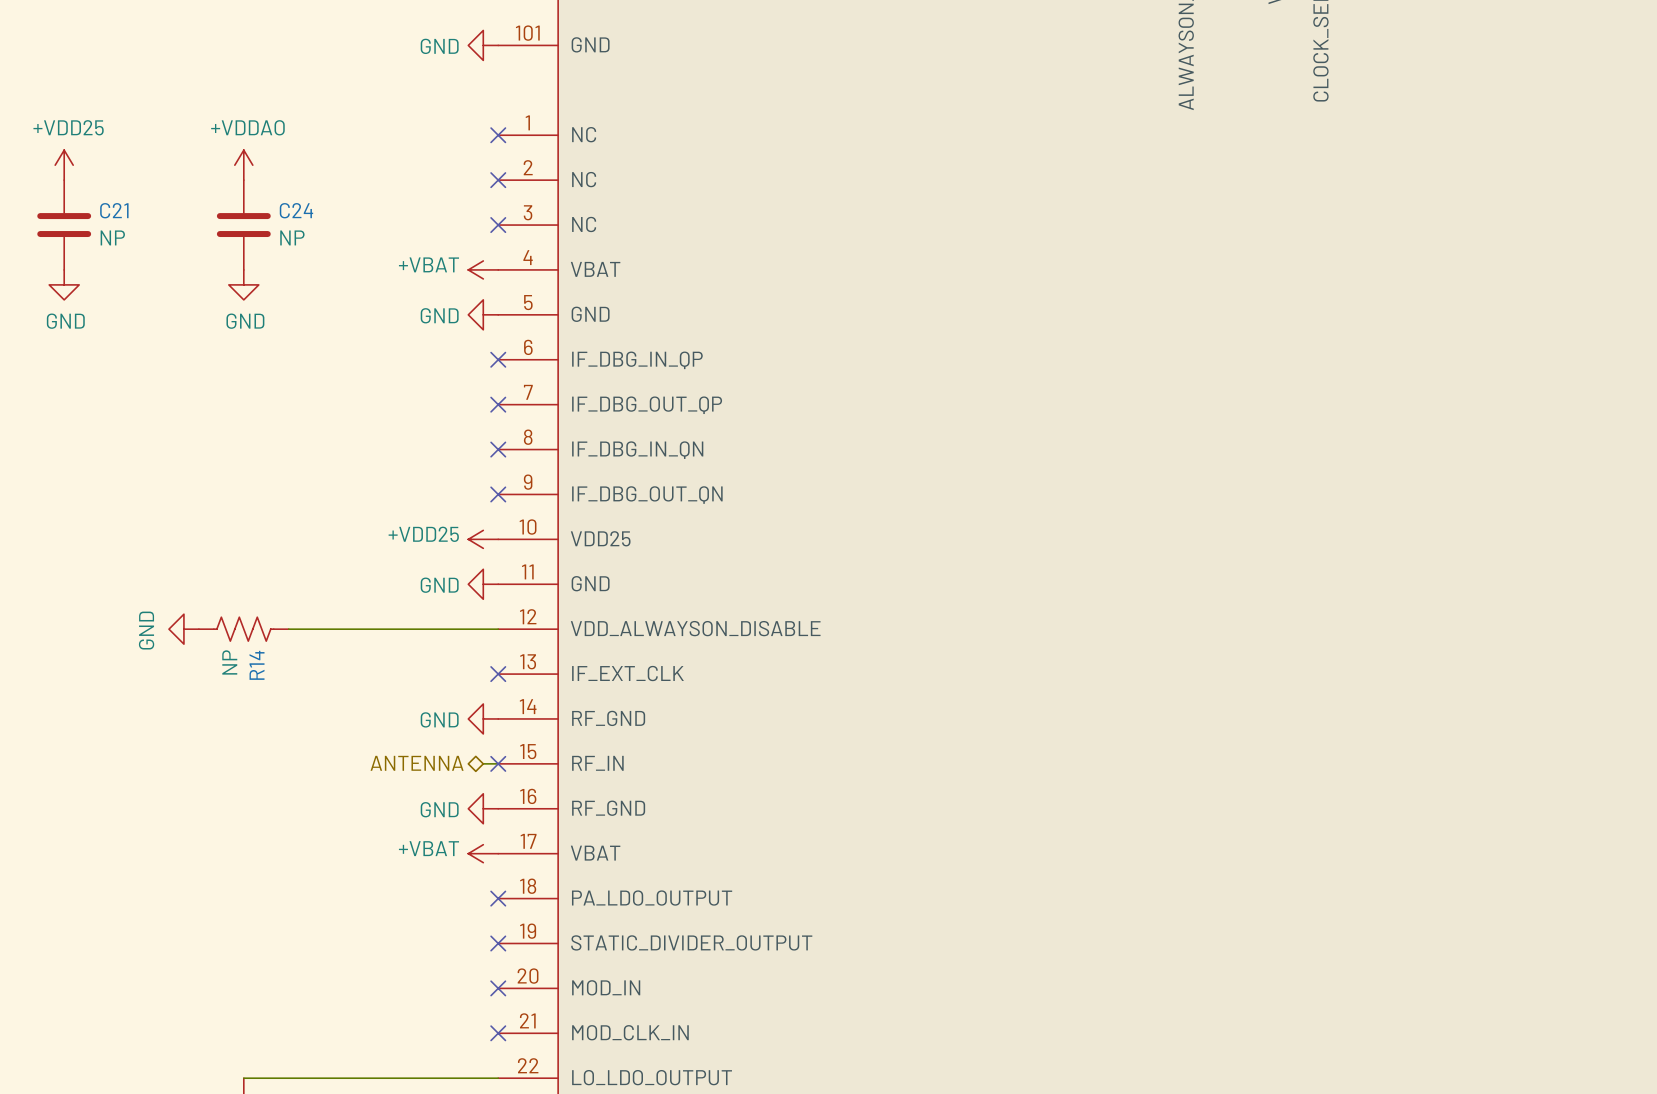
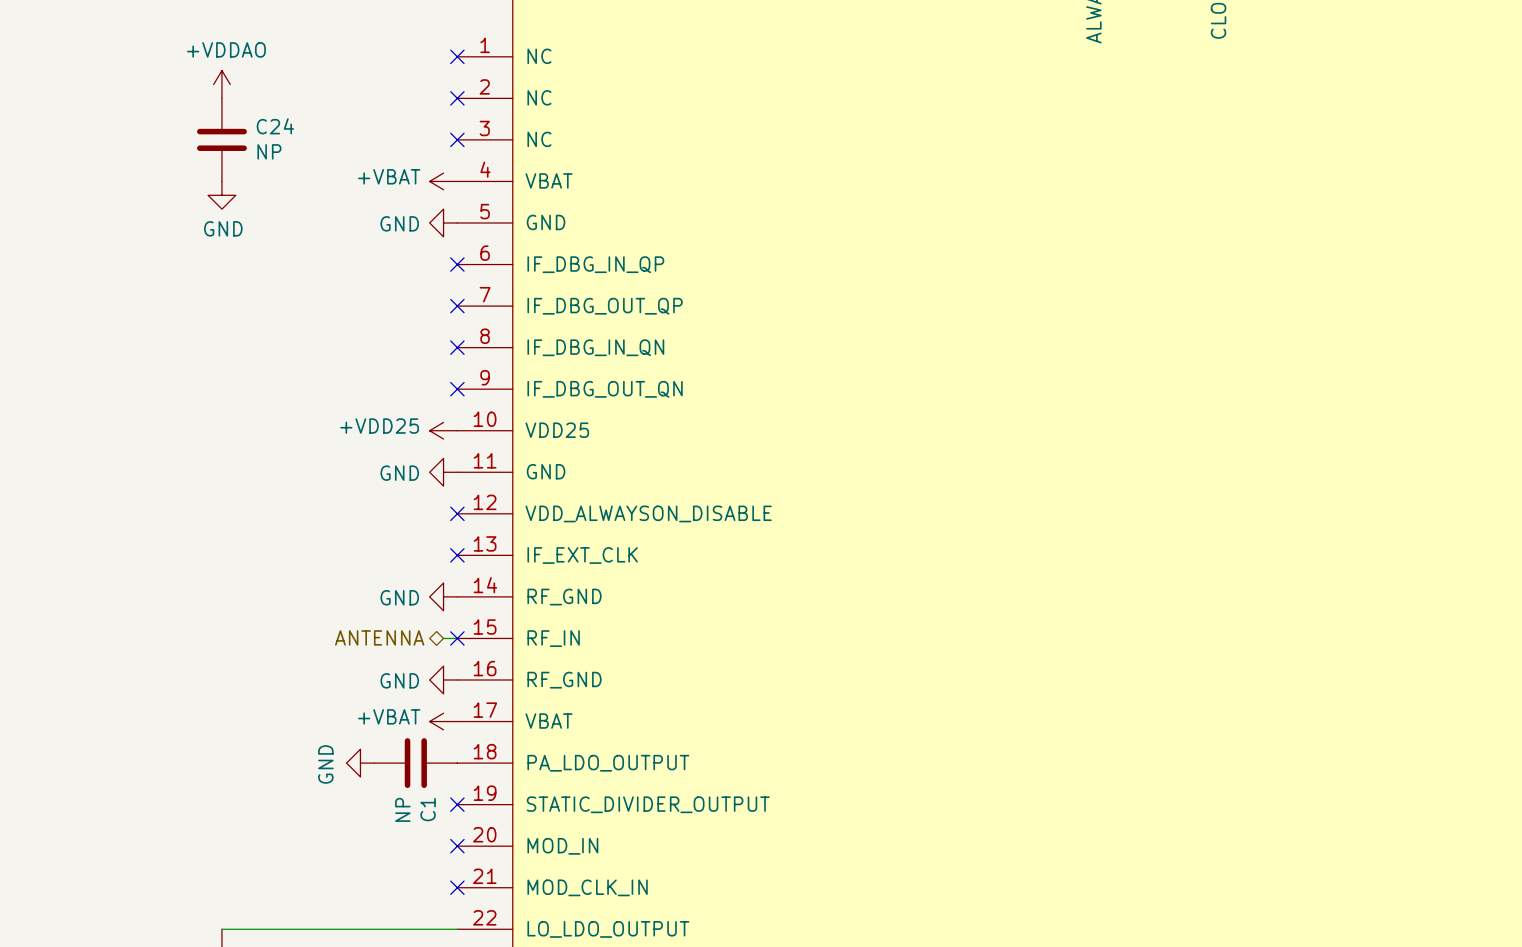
power symbol: +VDD25 (64, 165) -> none
C21: NP (64, 225) -> none
power symbol: GND (64, 284) -> none
power symbol: GND (183, 629) -> none
R14: NP (243, 629) -> none
wire: (288, 629) (498, 629) -> none
no-connect mark: none -> (457, 513)
power symbol: none -> GND (360, 763)
C1: none -> NP (415, 763)
no-connect mark: (498, 898) -> none

